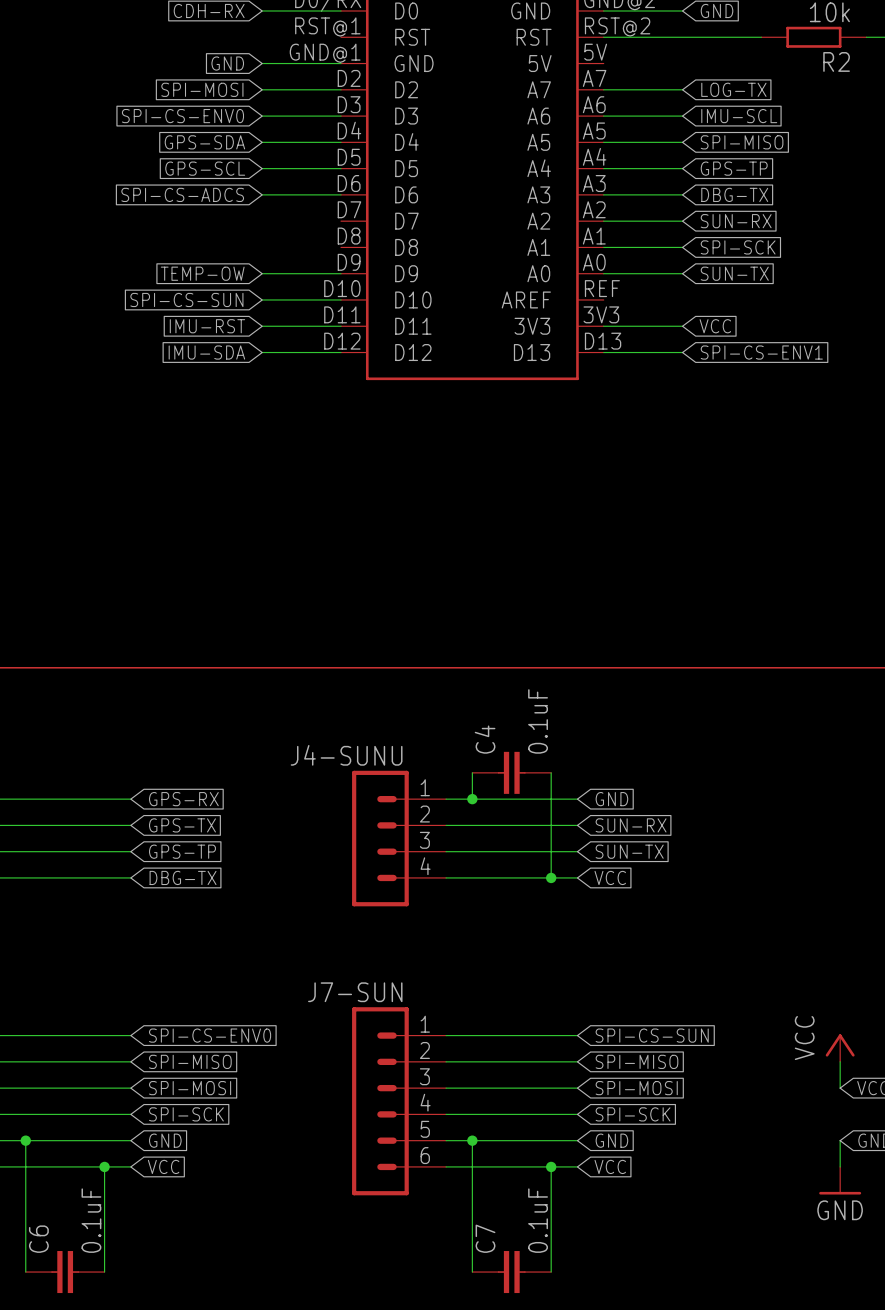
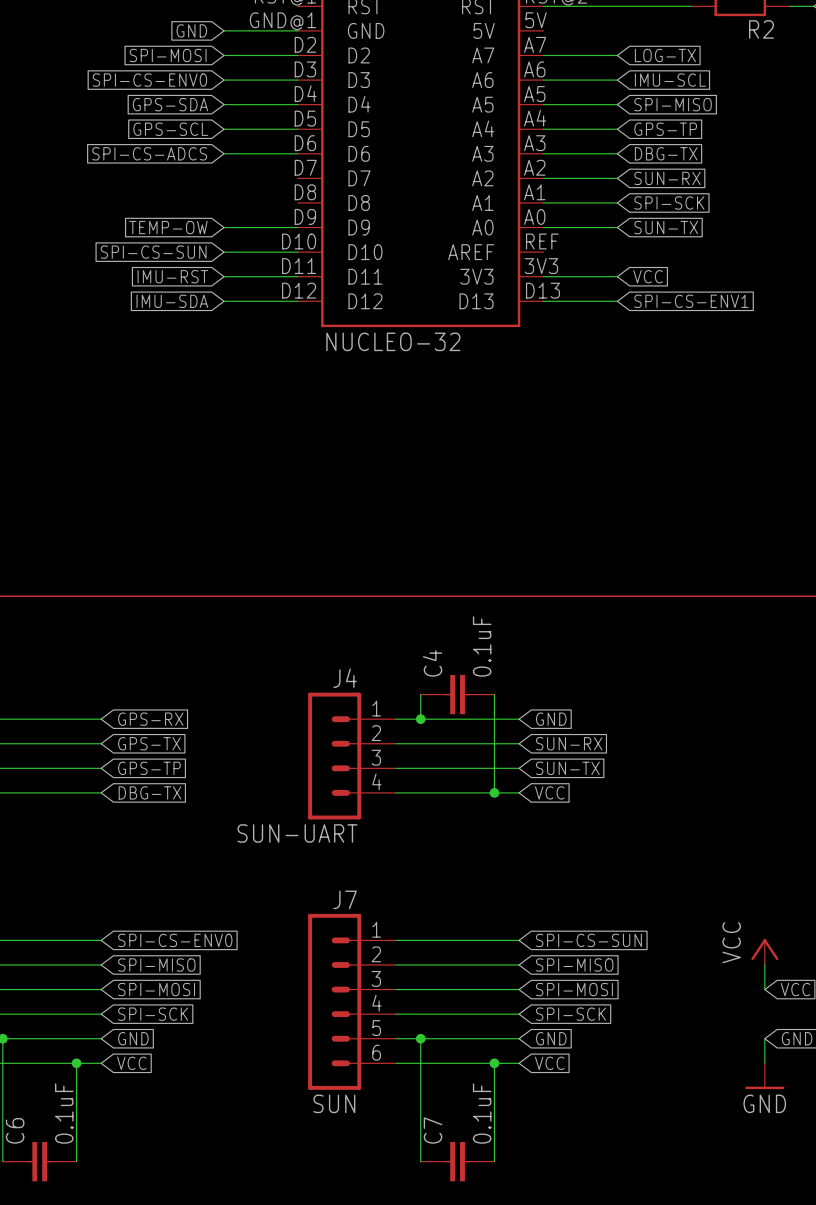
part value: none -> NUCLEO-32 (393, 341)
J4-SUNU name: J4-SUNU (346, 755) -> J4 (345, 678)
J4-SUNU value: none -> SUN-UART (297, 833)
J7-SUN name: J7-SUN (355, 992) -> J7 (345, 899)
J7-SUN value: none -> SUN (334, 1103)

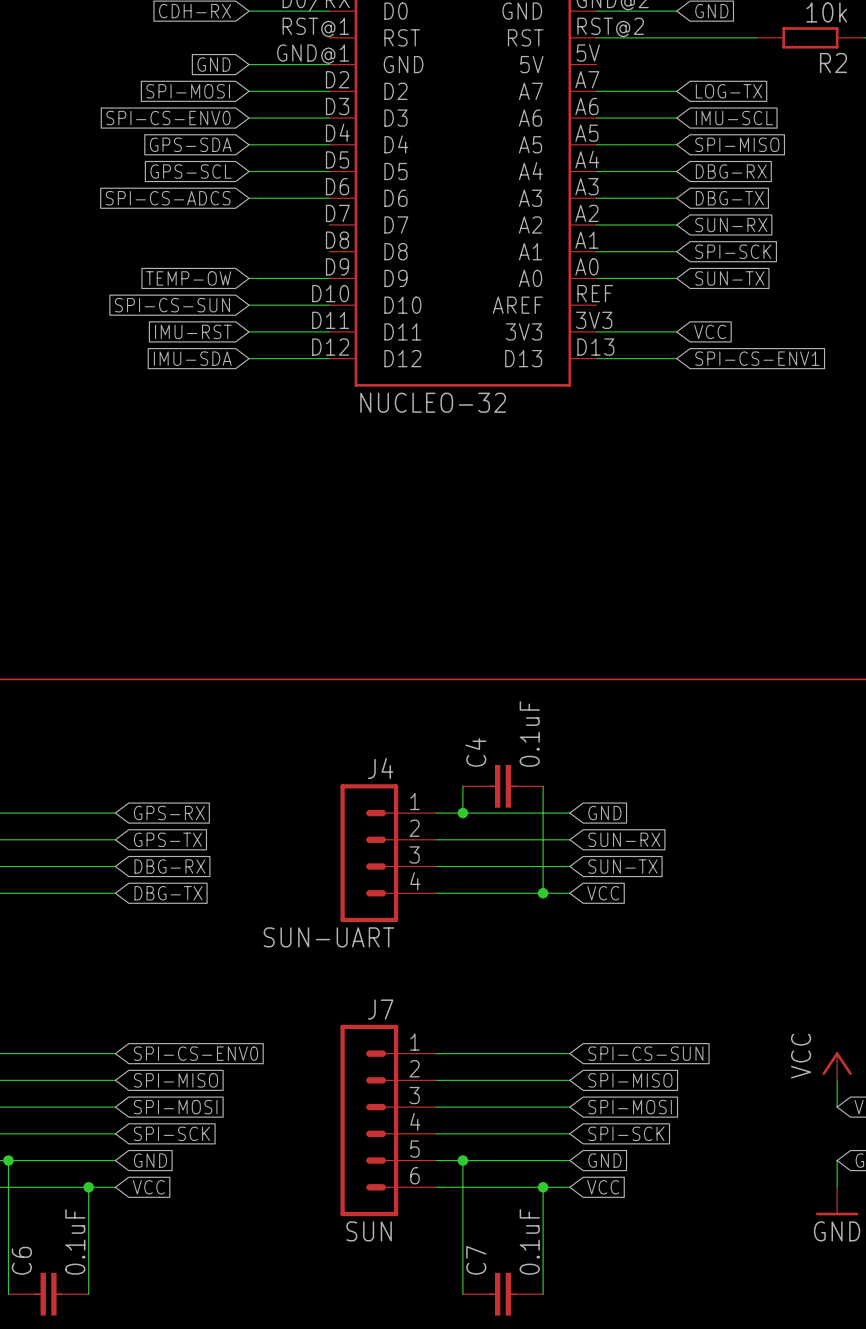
global label: GPS-TP (665, 129) -> DBG-RX (731, 171)
global label: GPS-TP (149, 768) -> DBG-RX (169, 866)

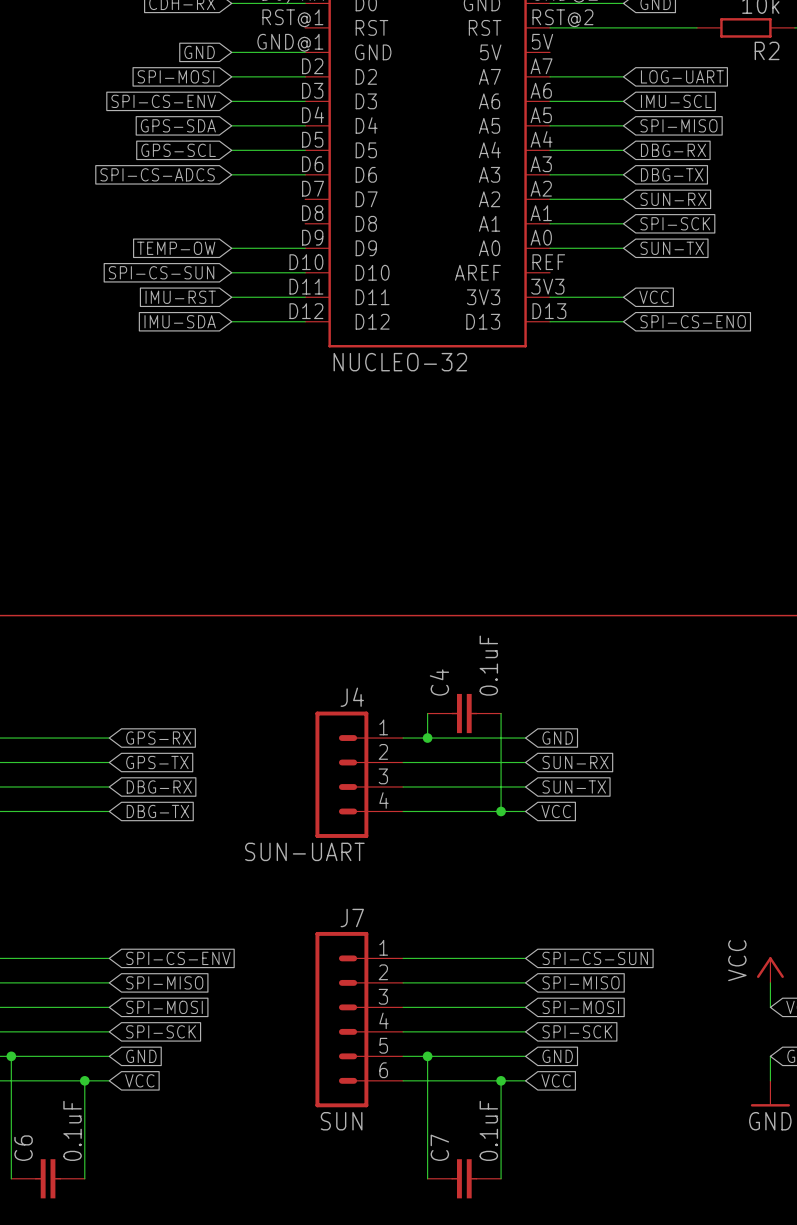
global label: LOG-TX (729, 91) -> LOG-UART (682, 76)
global label: SPI-CS-ENV0 (168, 118) -> SPI-CS-ENV (163, 101)
global label: SPI-CS-ENV1 (757, 358) -> SPI-CS-ENO (693, 321)
global label: SPI-CS-ENV0 (196, 1053) -> SPI-CS-ENV (178, 958)

